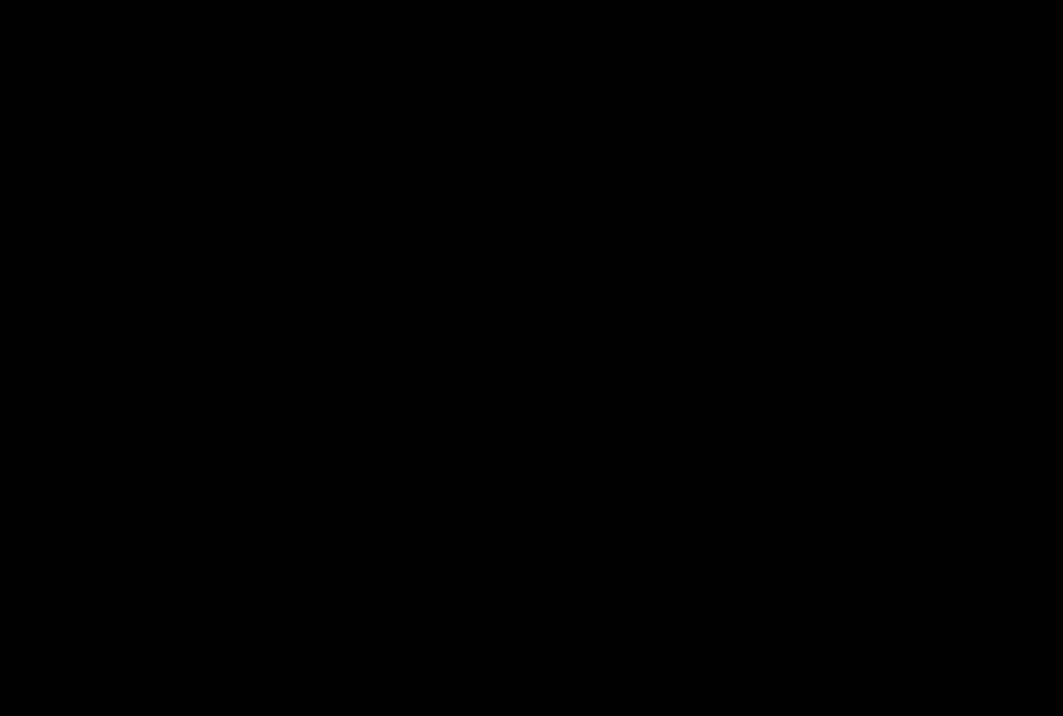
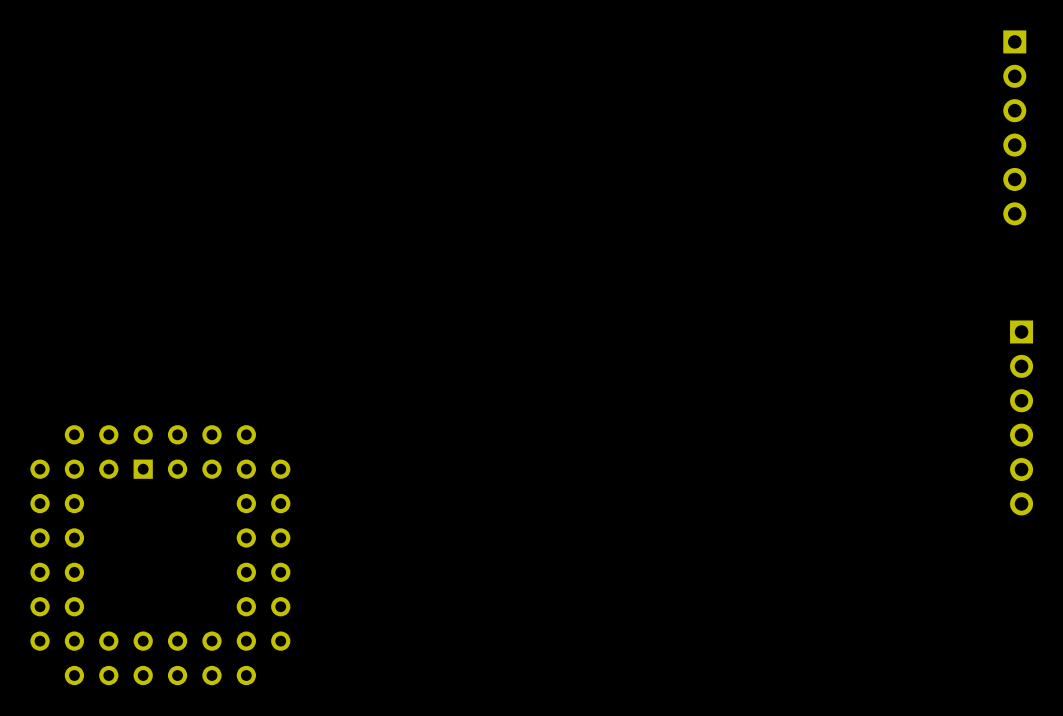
part: none -> (1014, 127)
part: none -> (1021, 417)
part: none -> (160, 555)

